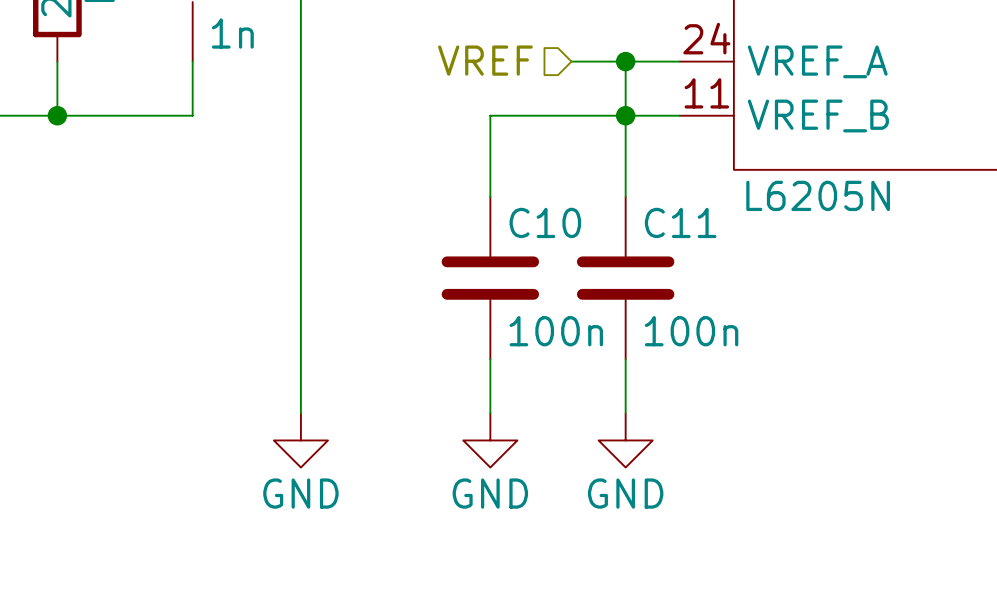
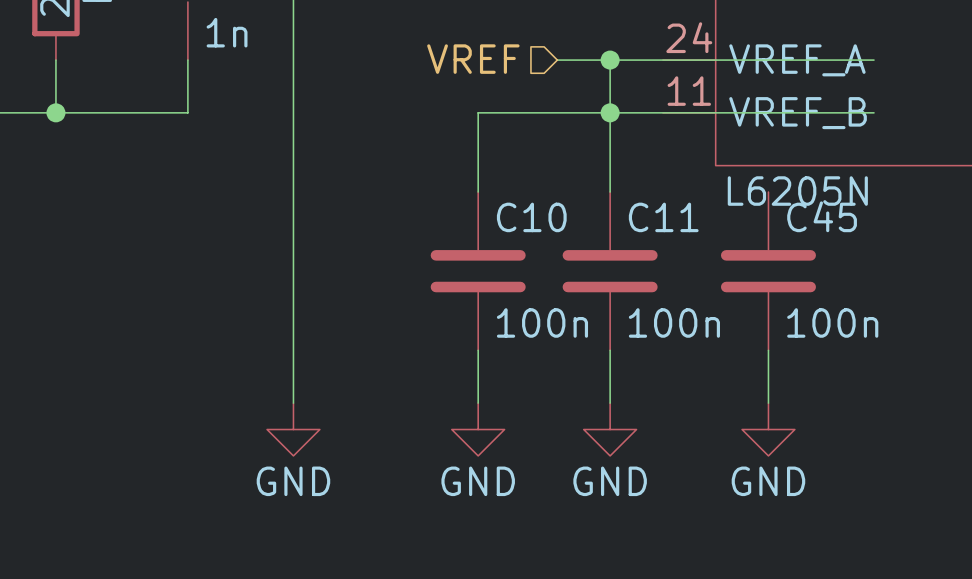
wire: none -> (662, 60) (874, 60)
wire: none -> (662, 112) (874, 112)
C45: none -> 100n (768, 271)
wire: none -> (768, 350) (768, 403)
power symbol: none -> GND (768, 429)

